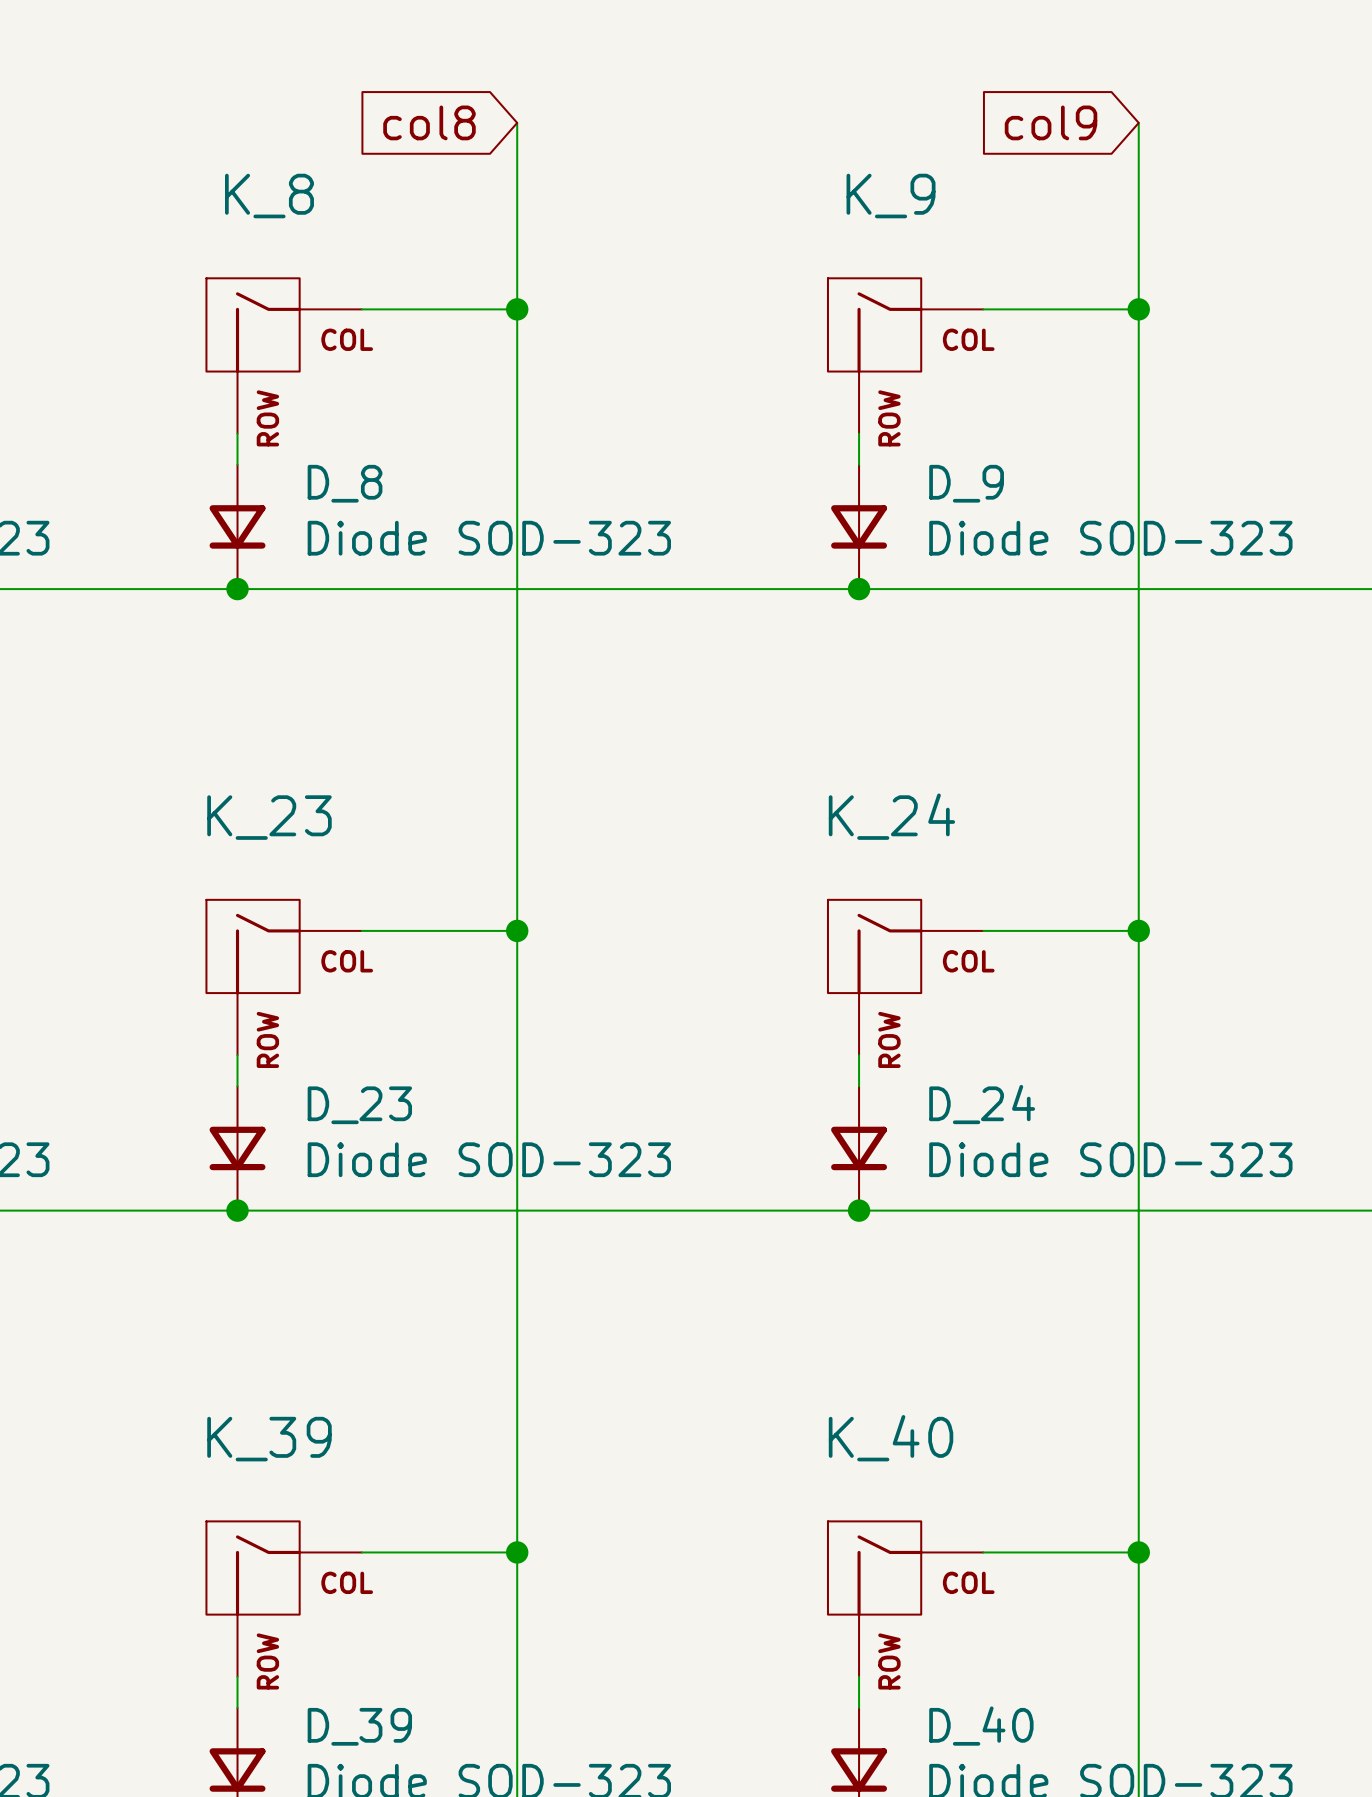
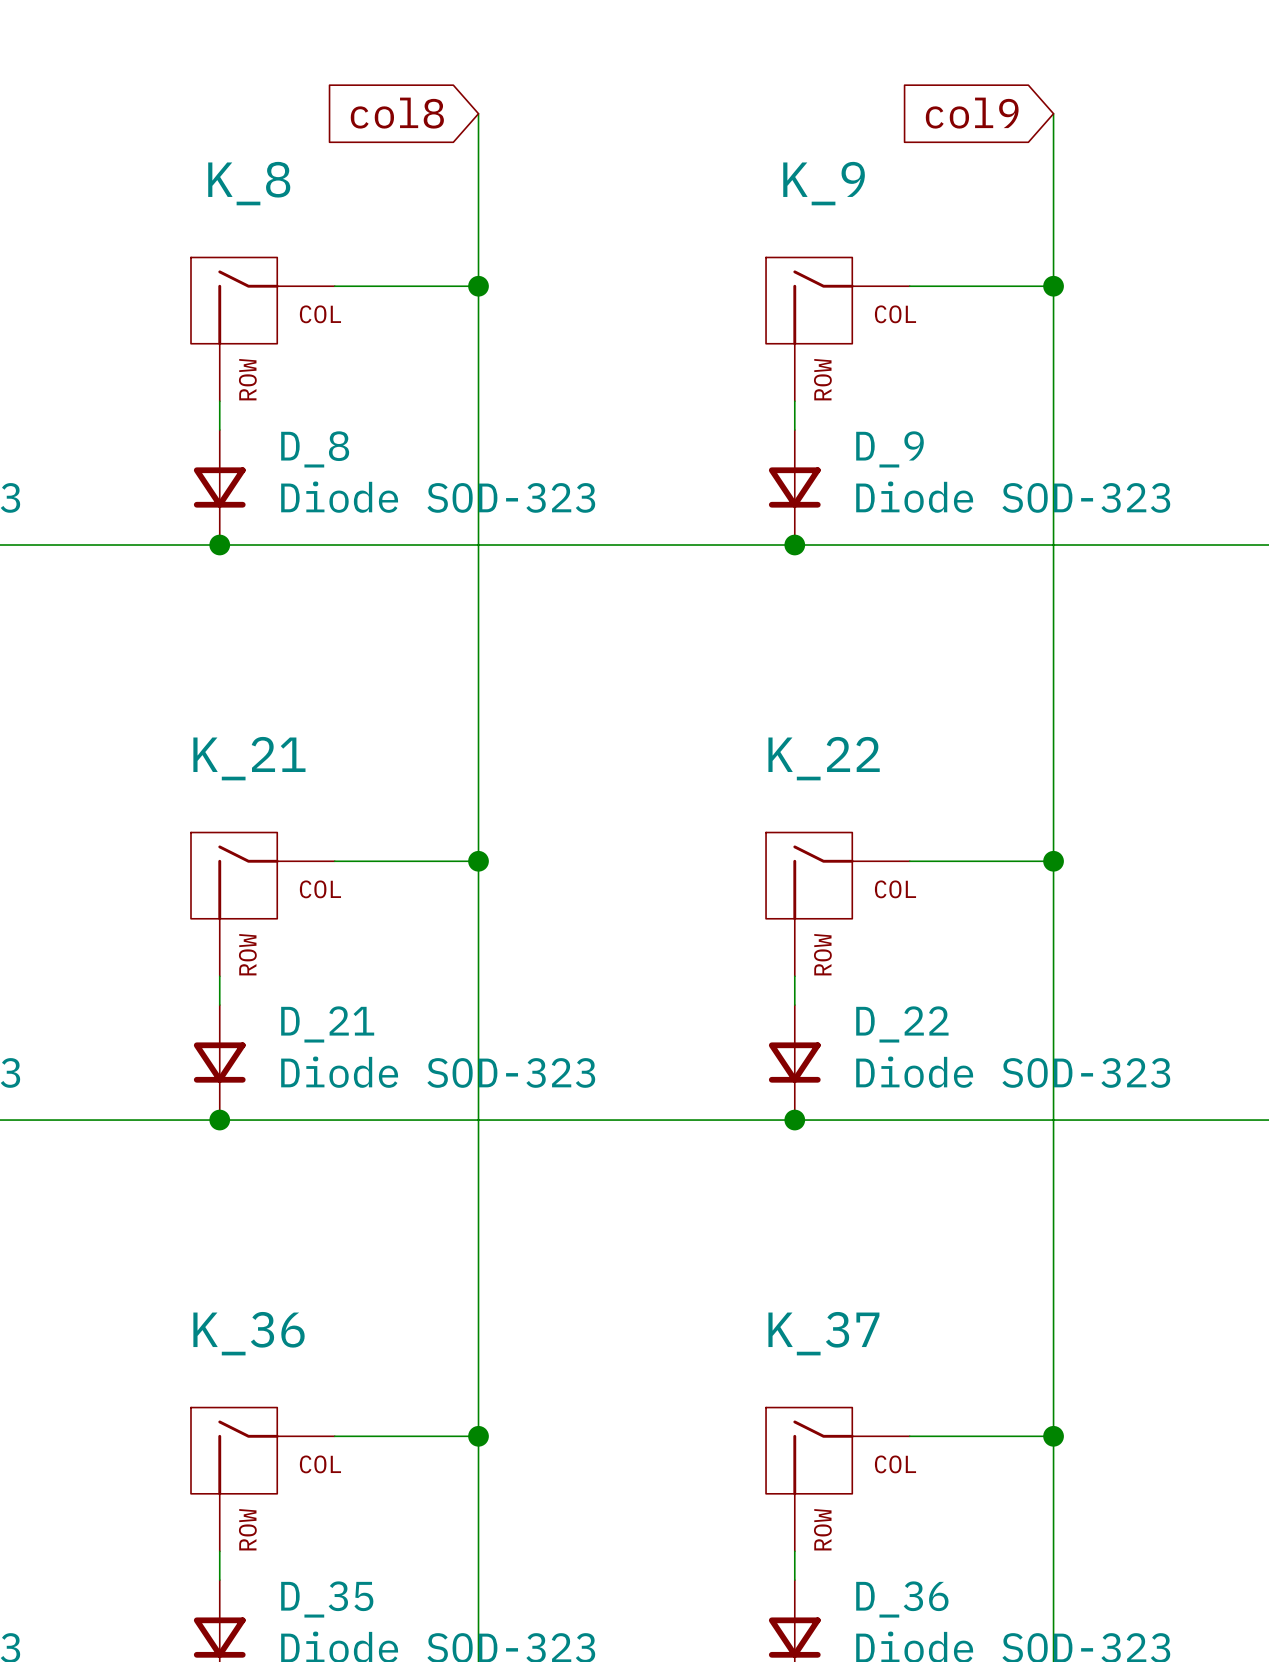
K_24 name: K_24 (891, 816) -> K_22 (824, 758)
K_23 name: K_23 (269, 817) -> K_21 (249, 758)
D_24 name: D_24 (982, 1104) -> D_22 (902, 1024)
D_23 name: D_23 (359, 1105) -> D_21 (327, 1024)
K_40 name: K_40 (891, 1438) -> K_37 (823, 1333)
K_39 name: K_39 (269, 1439) -> K_36 (249, 1333)
D_39 name: D_39 (359, 1726) -> D_35 (327, 1599)
D_40 name: D_40 (981, 1726) -> D_36 (902, 1599)

